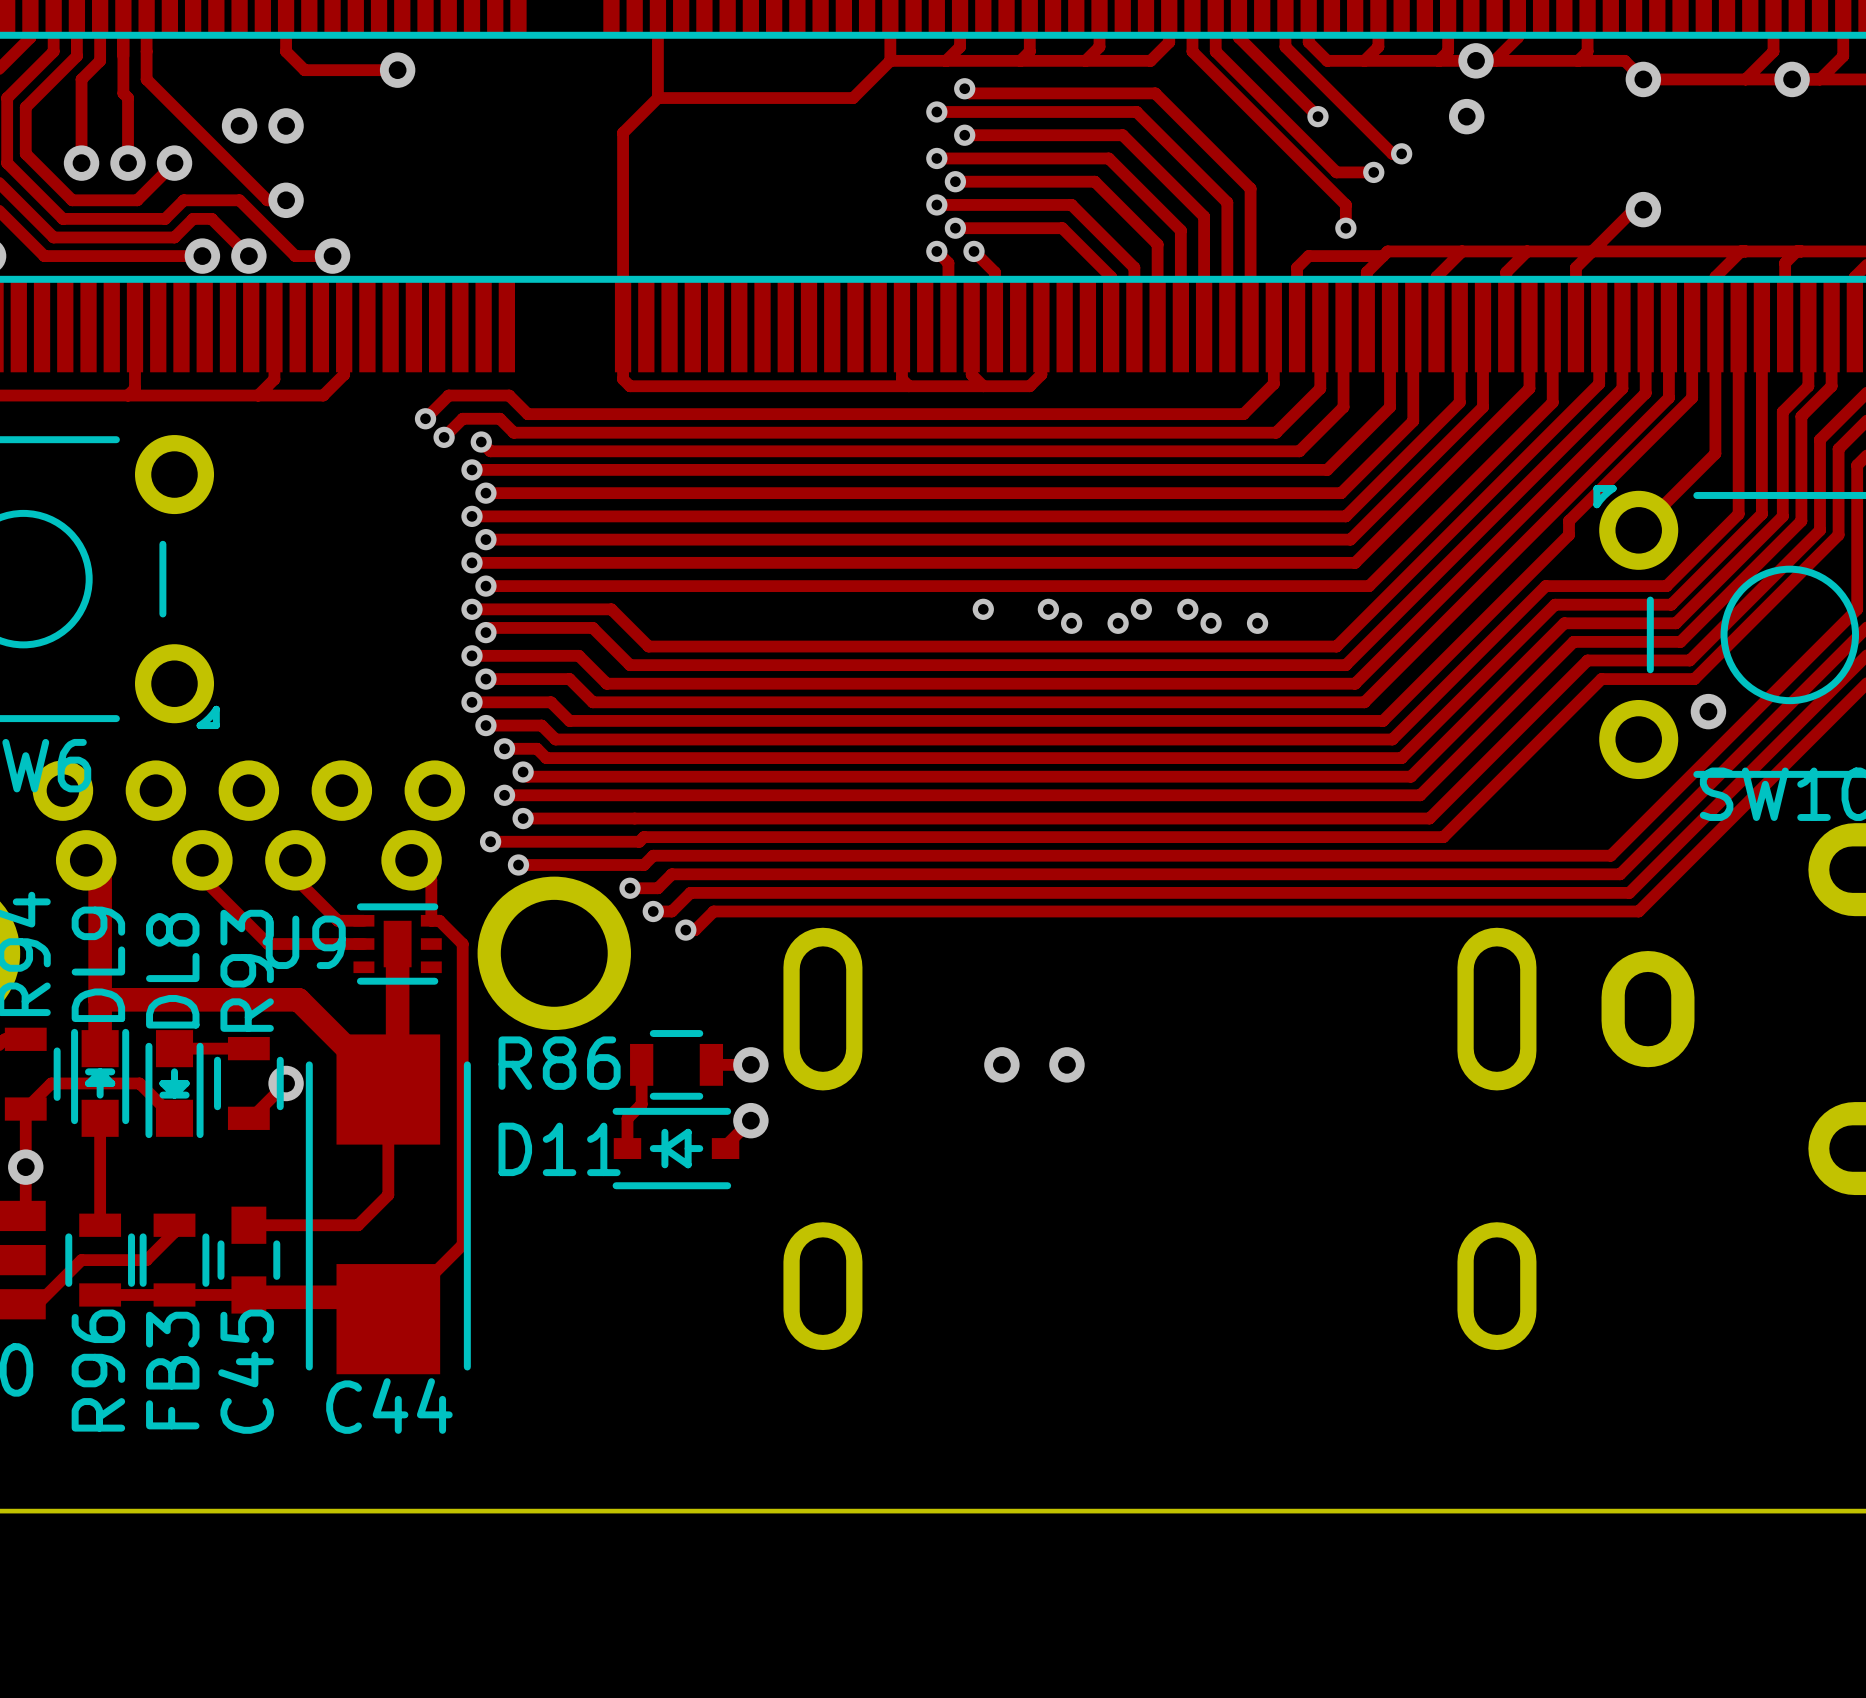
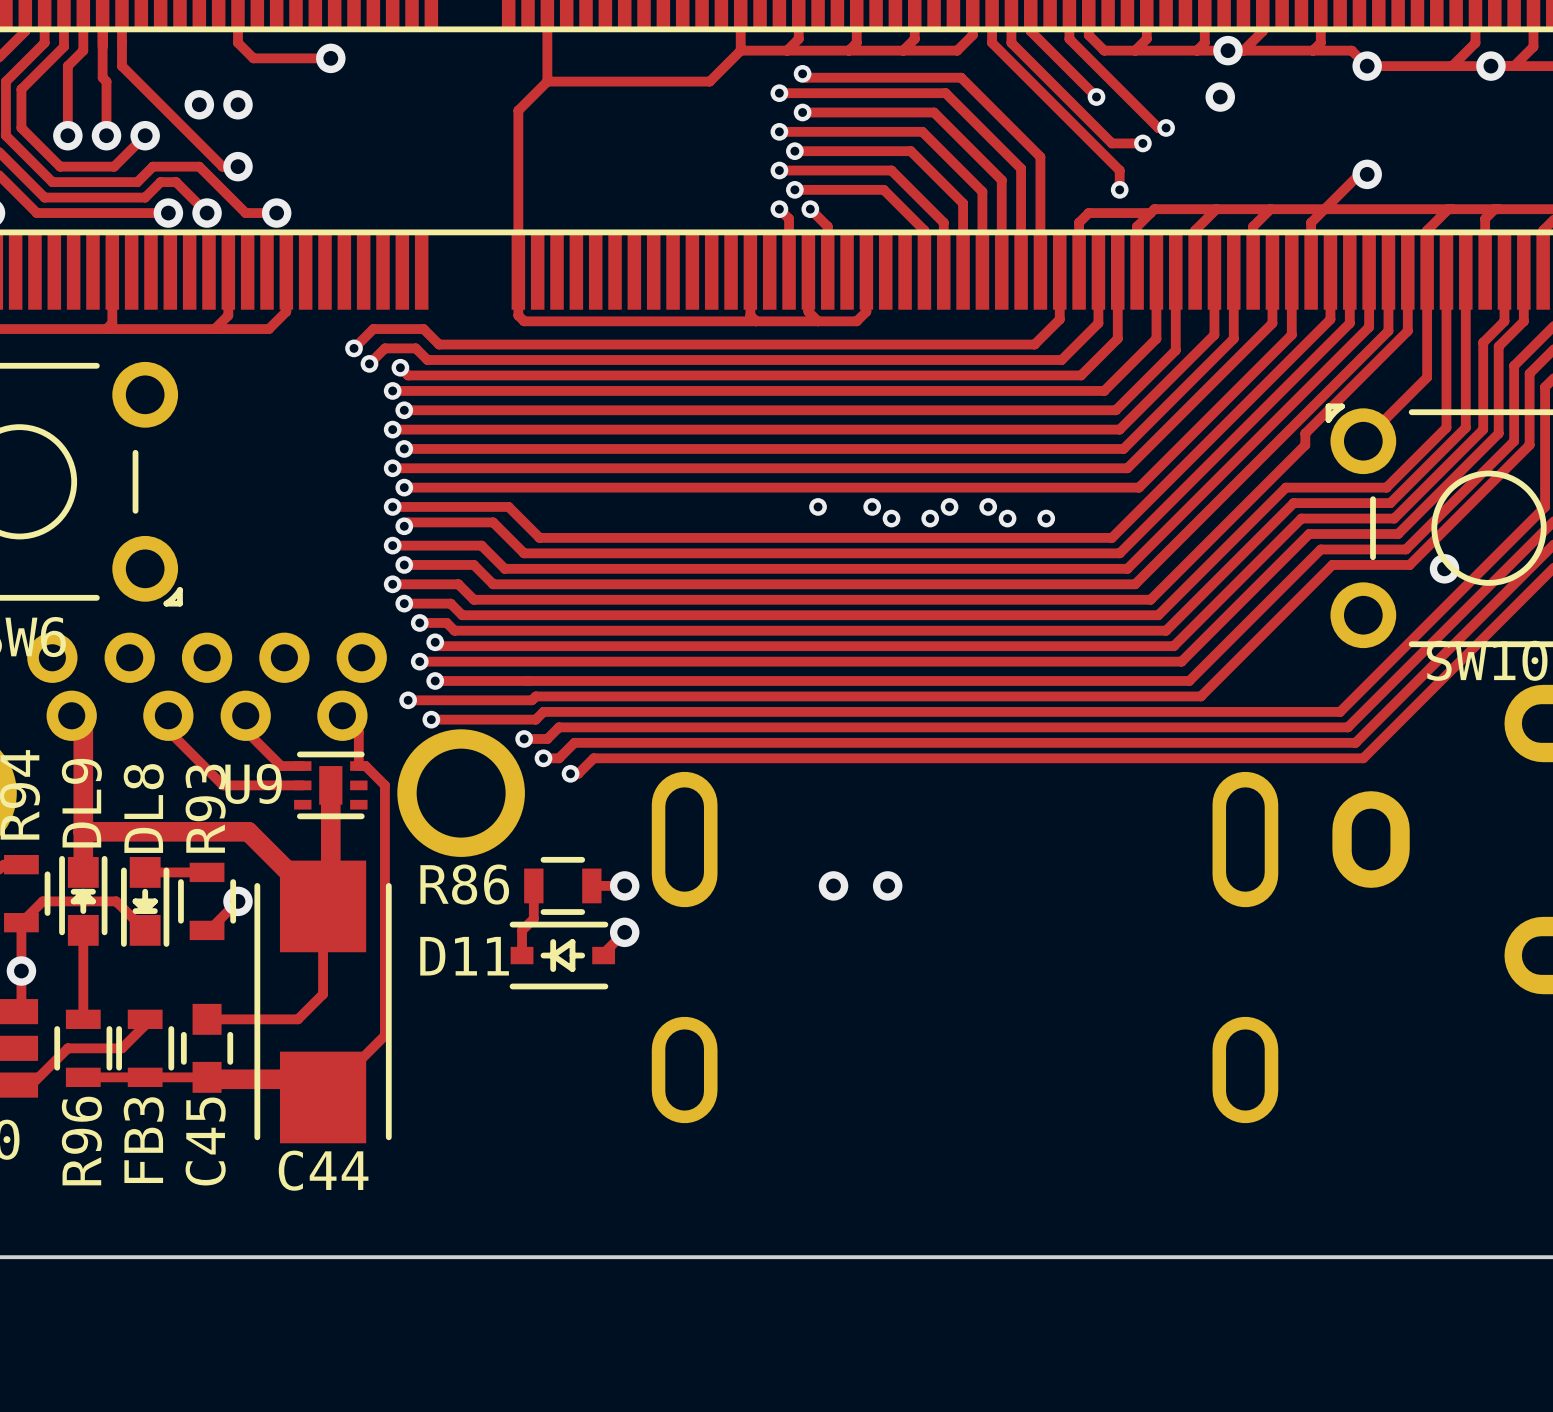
via position: (1708, 711) -> (1444, 568)

